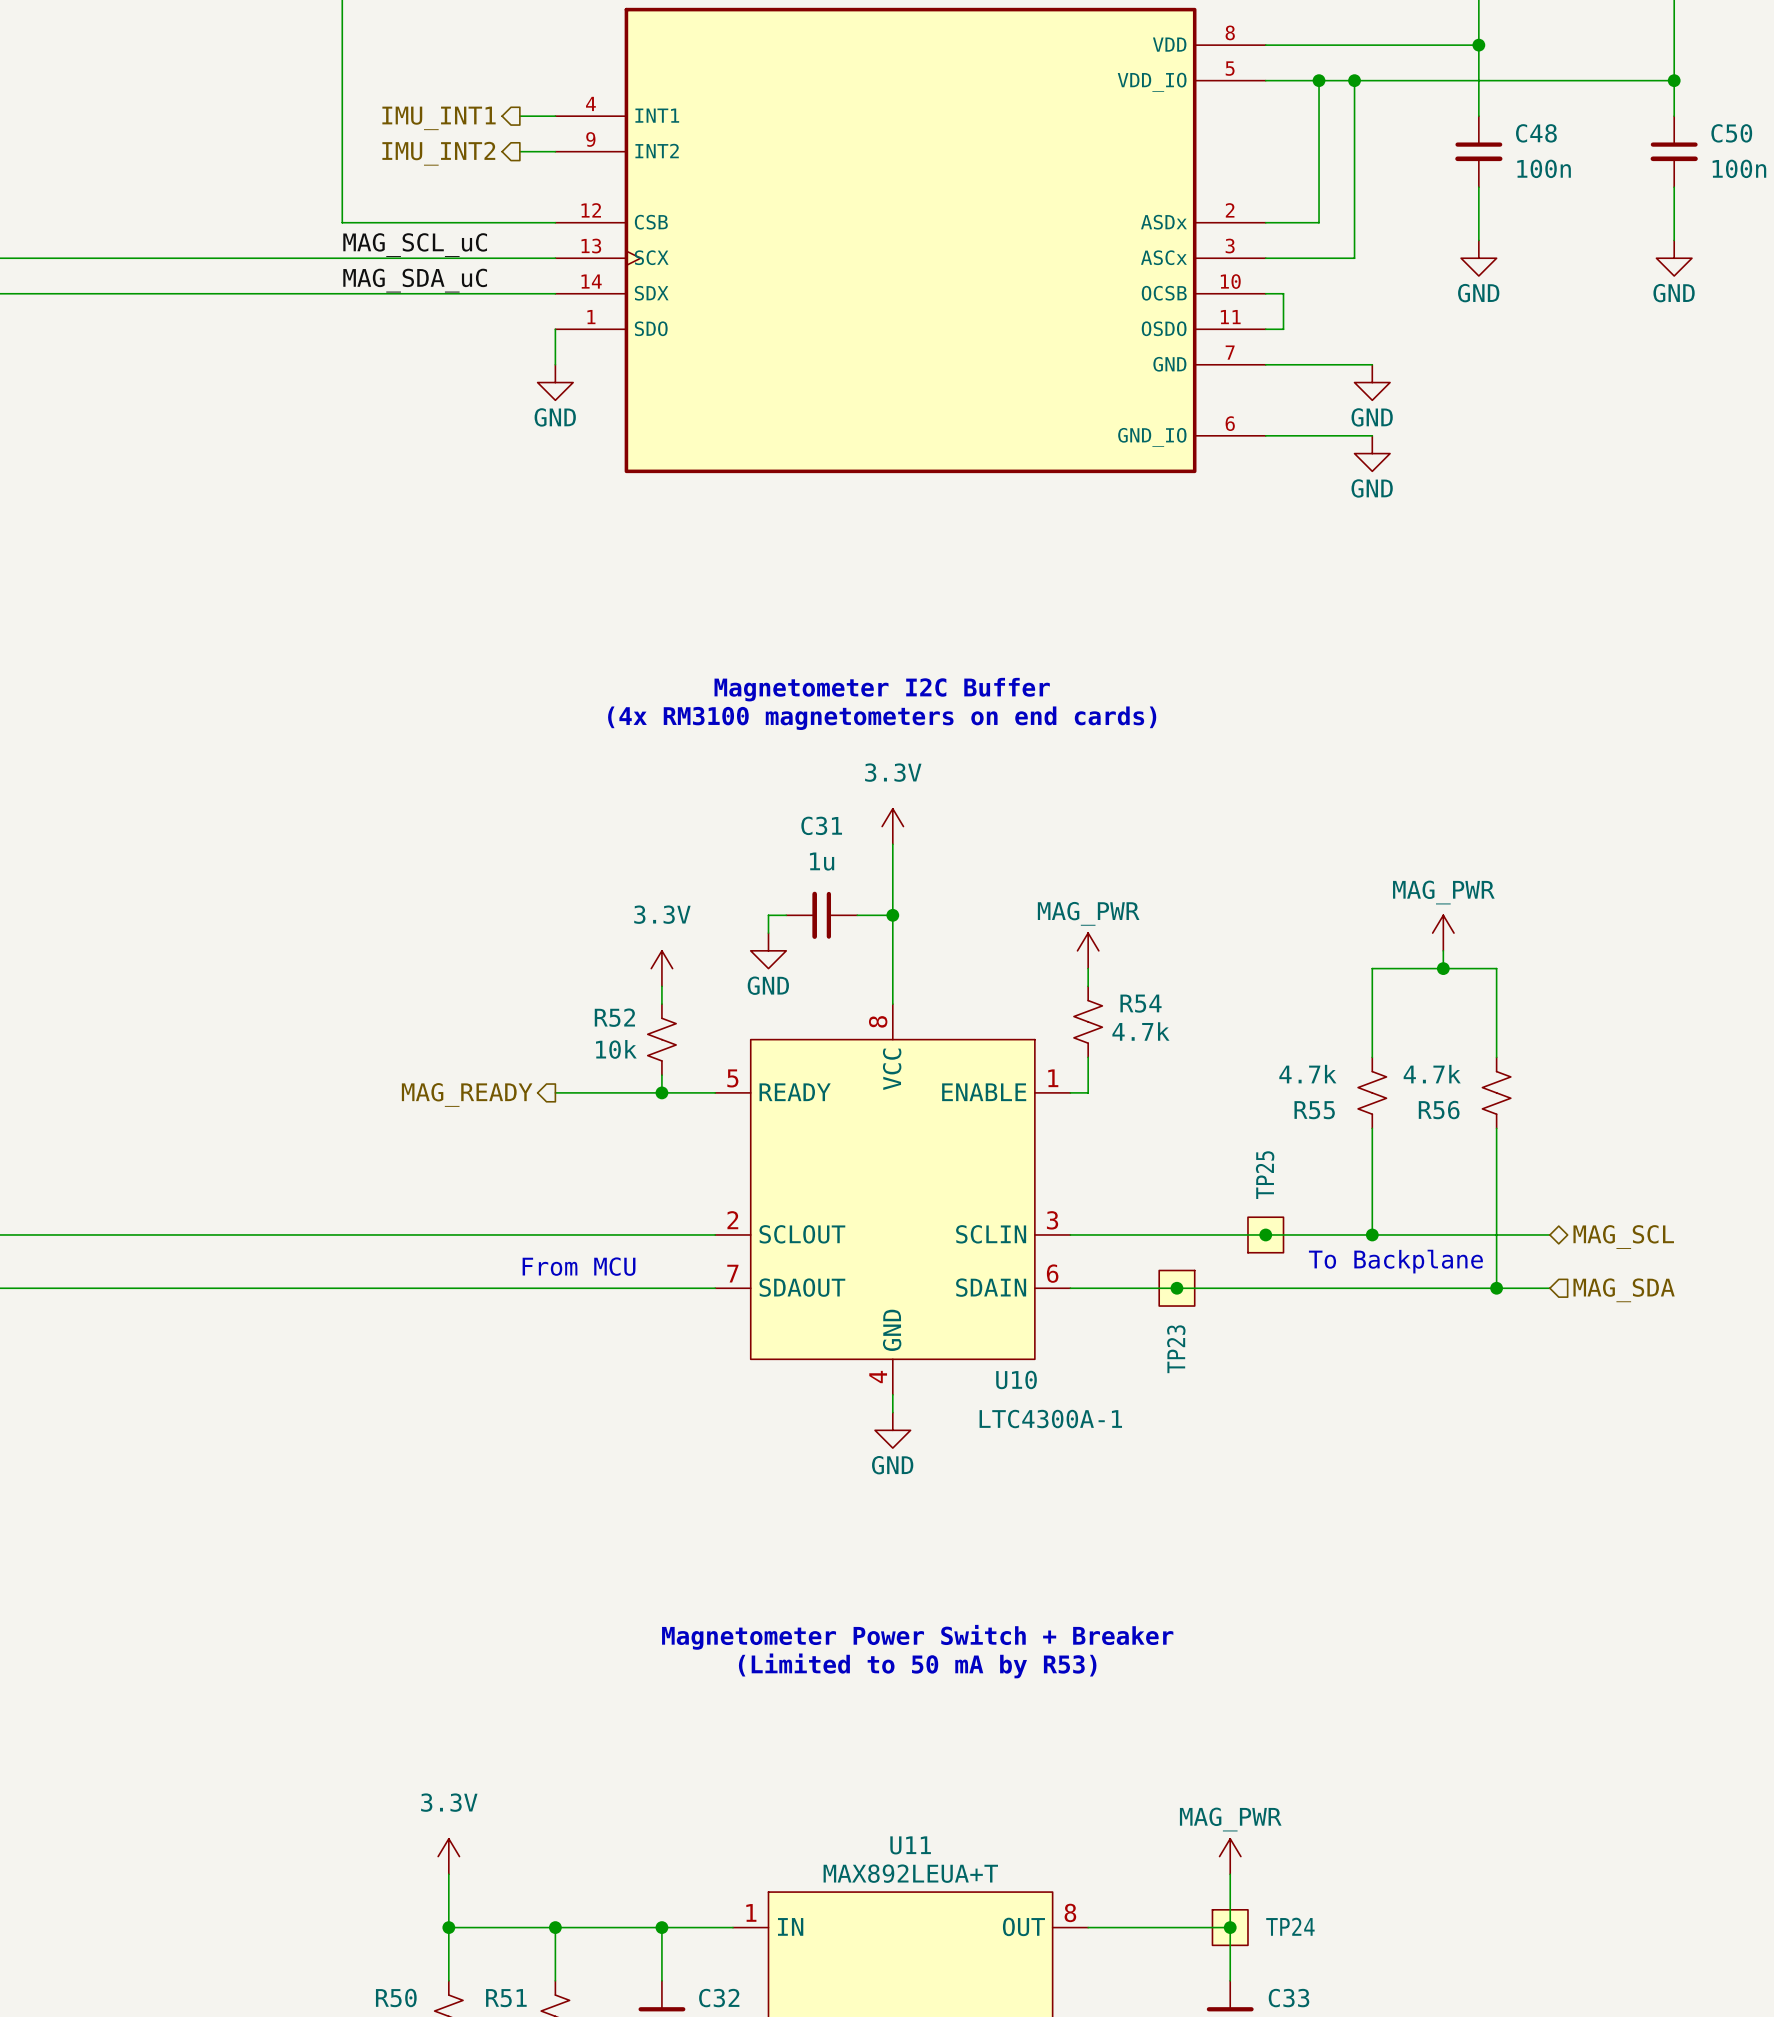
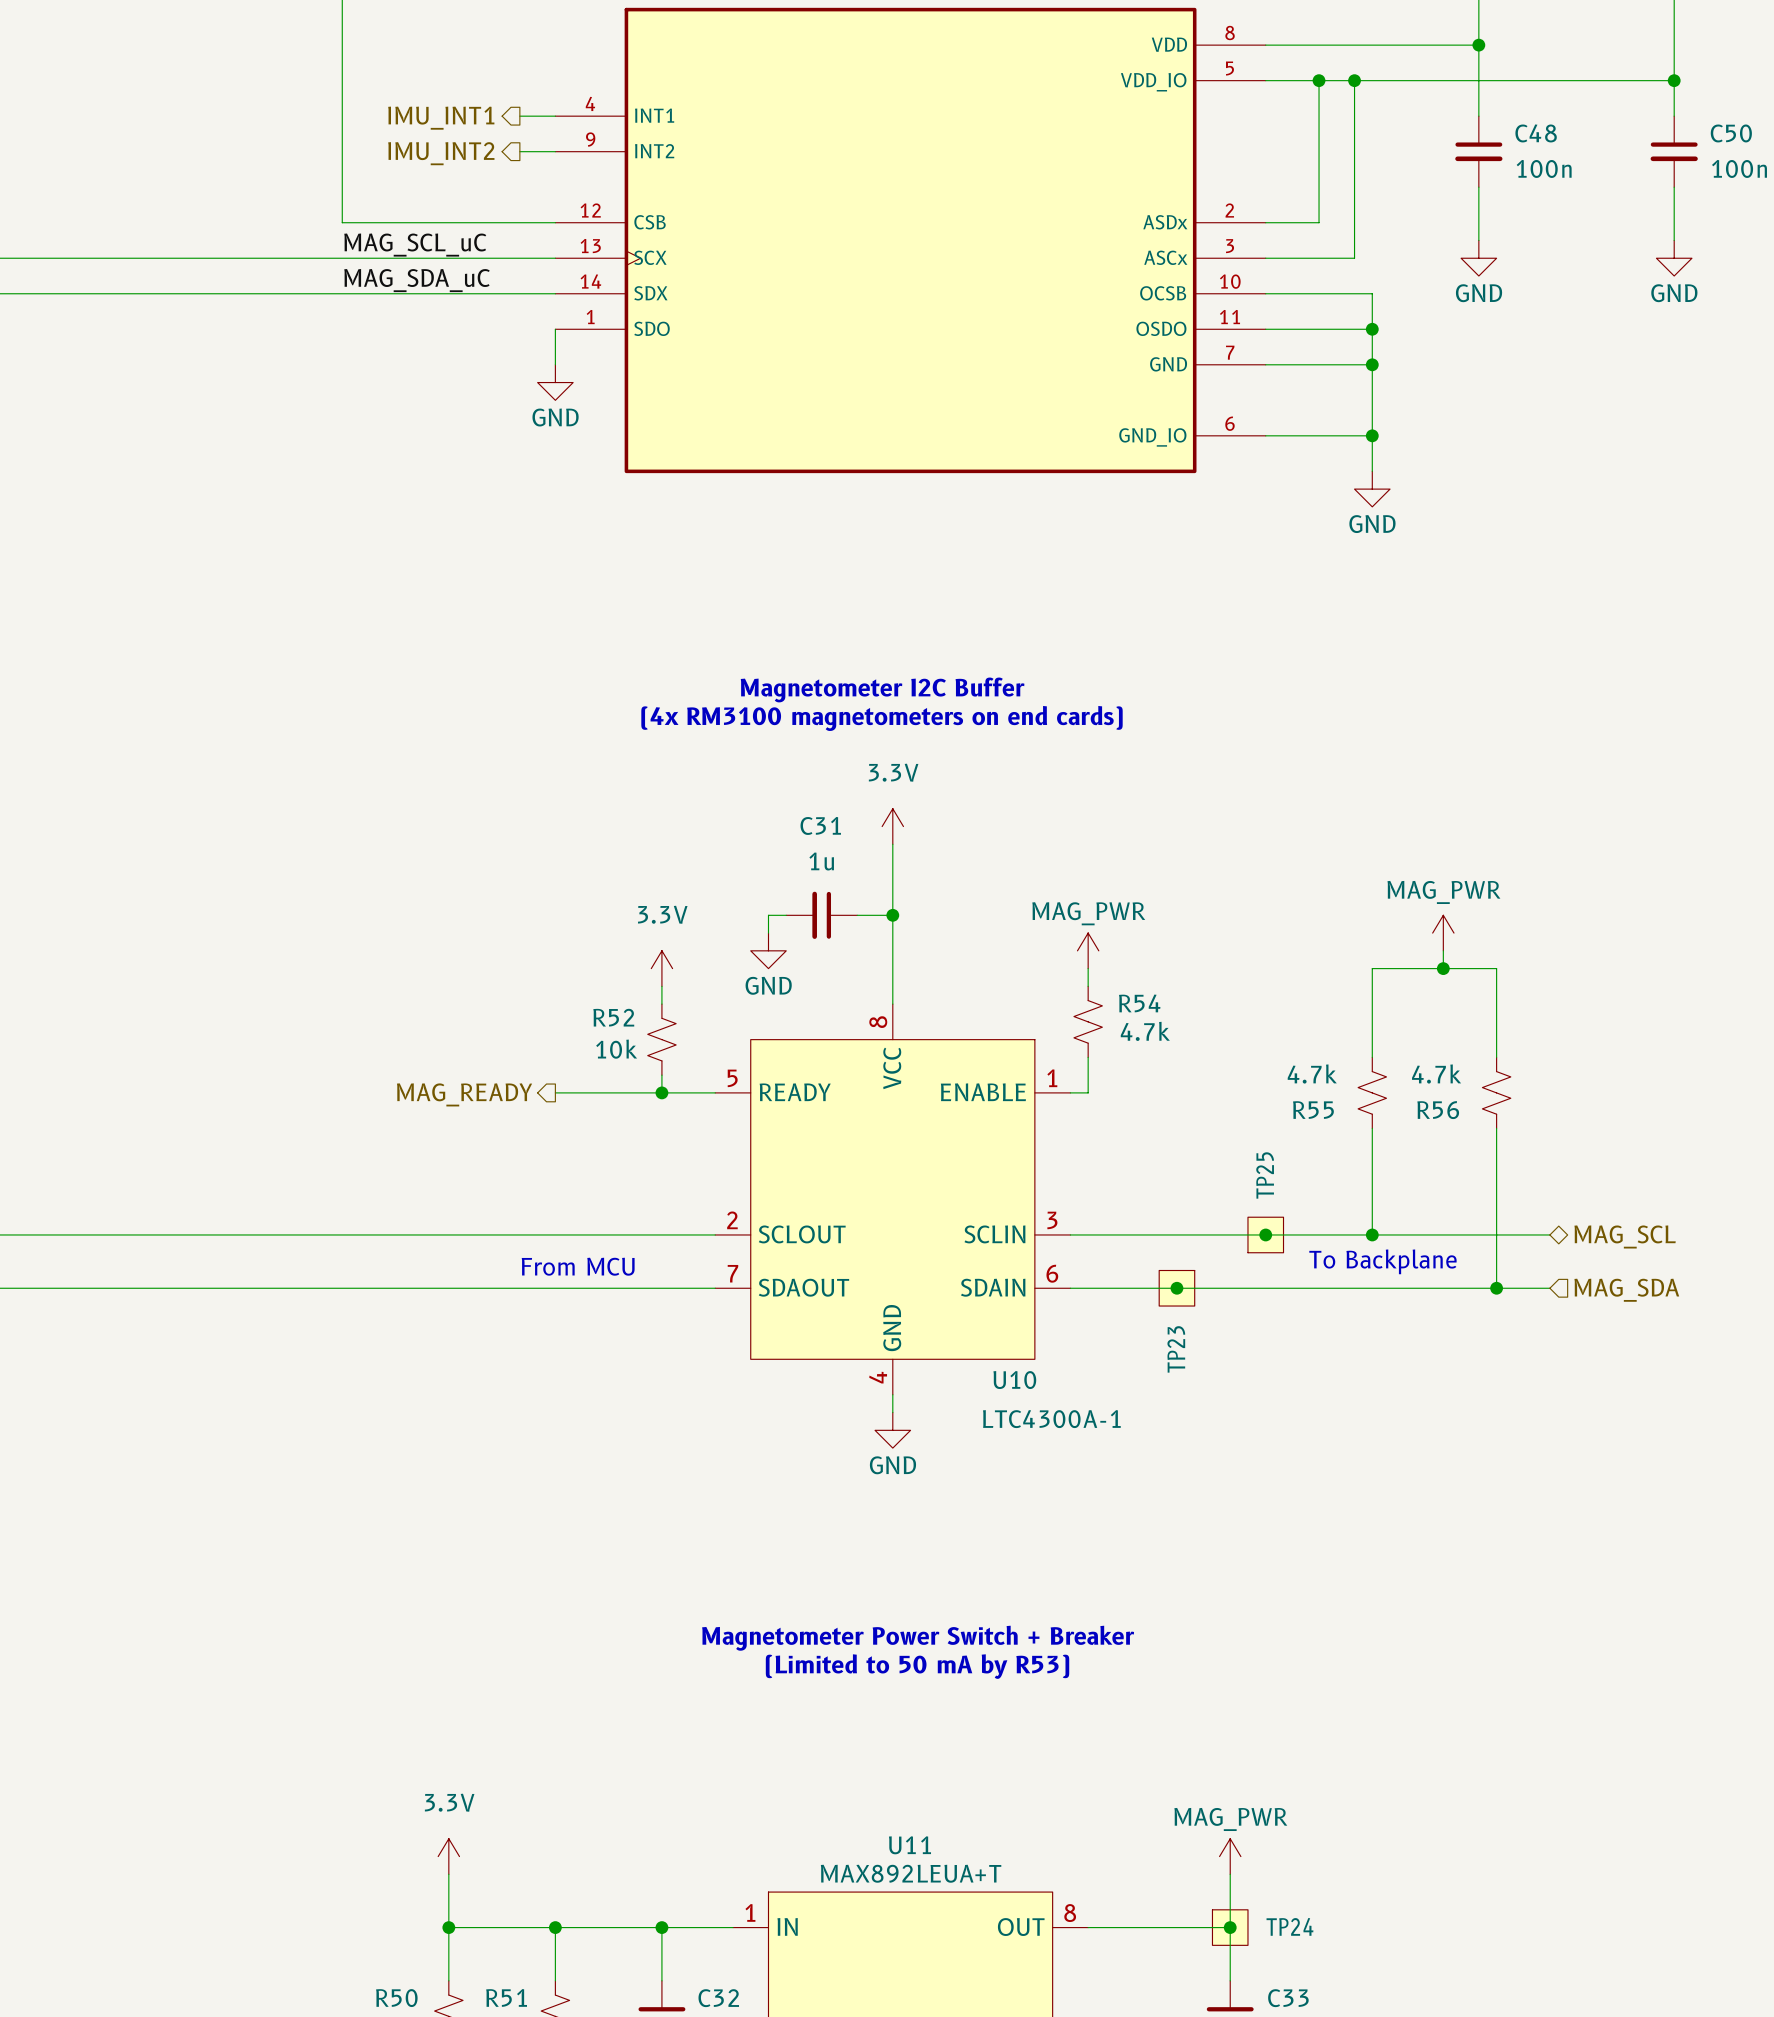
wire: (1283, 293) (1283, 329) -> (1372, 329) (1283, 329)
wire: none -> (1283, 293) (1372, 293) (1372, 471)
junction: none -> (1372, 329)
junction: none -> (1372, 364)
power symbol: GND (1372, 382) -> none
junction: none -> (1372, 435)
power symbol position: GND (1372, 453) -> GND (1372, 489)

